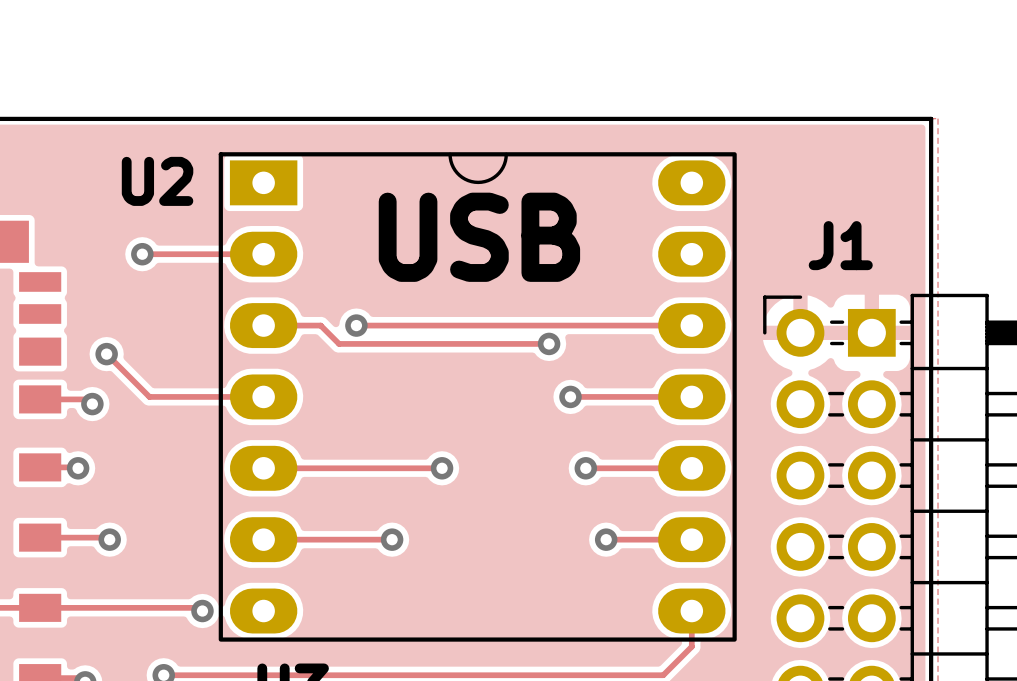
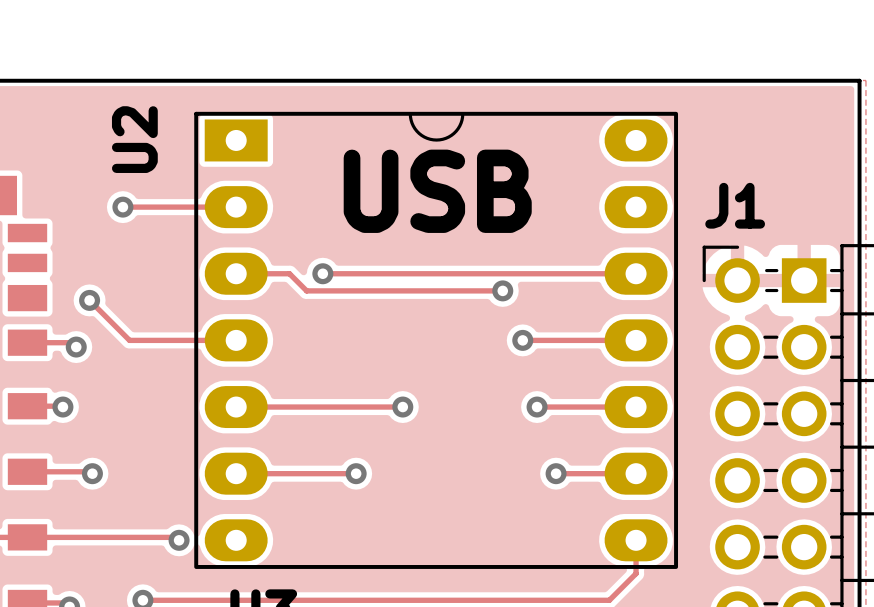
U2 name rotation: 0° (157, 181) -> 90° counterclockwise (134, 139)
J1 name position: J1 (840, 245) -> J1 (735, 205)

